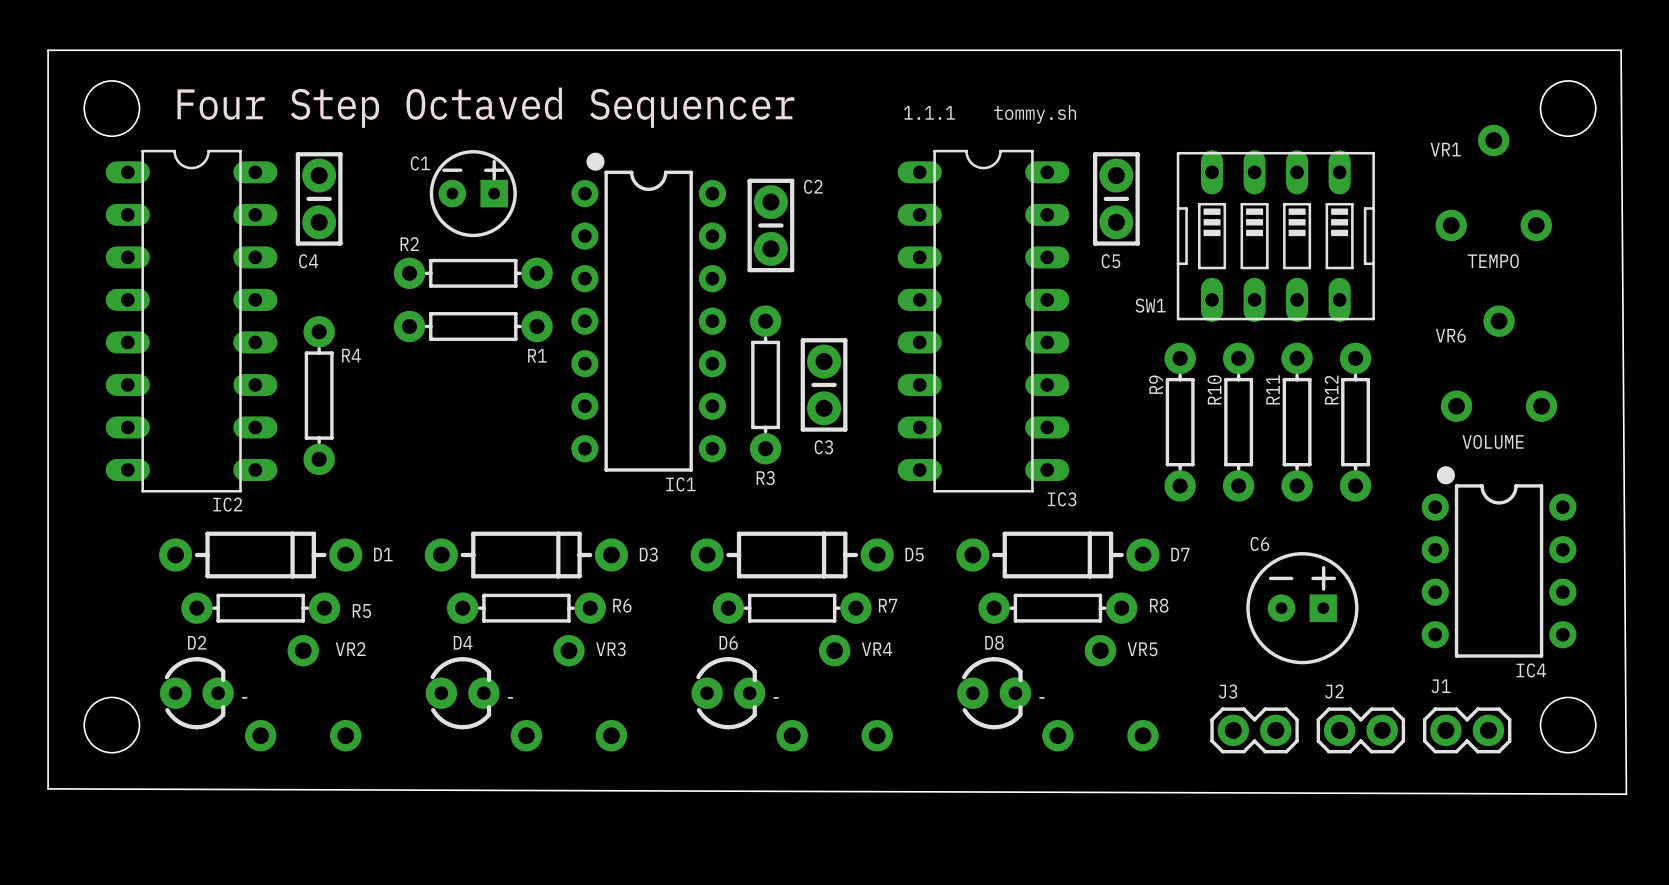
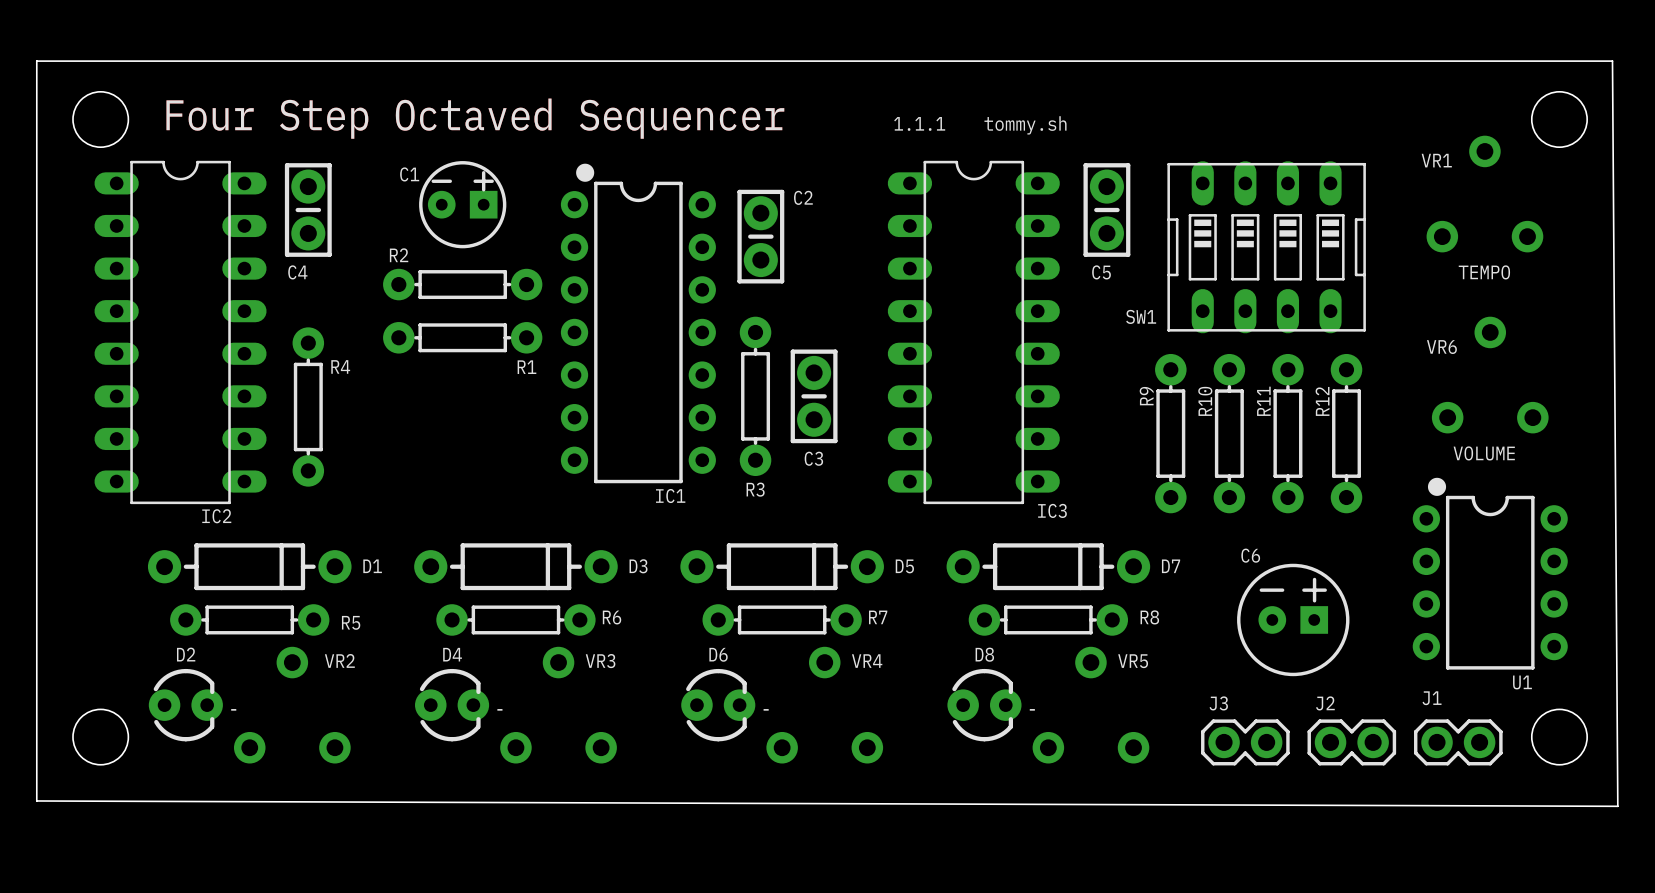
IC4 name: IC4 (1531, 670) -> U1 (1522, 682)

